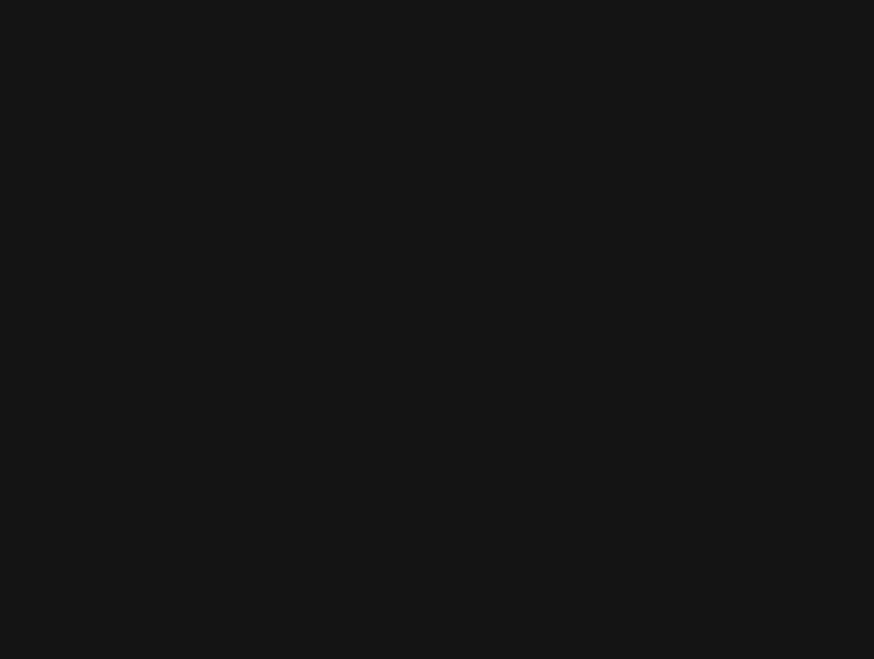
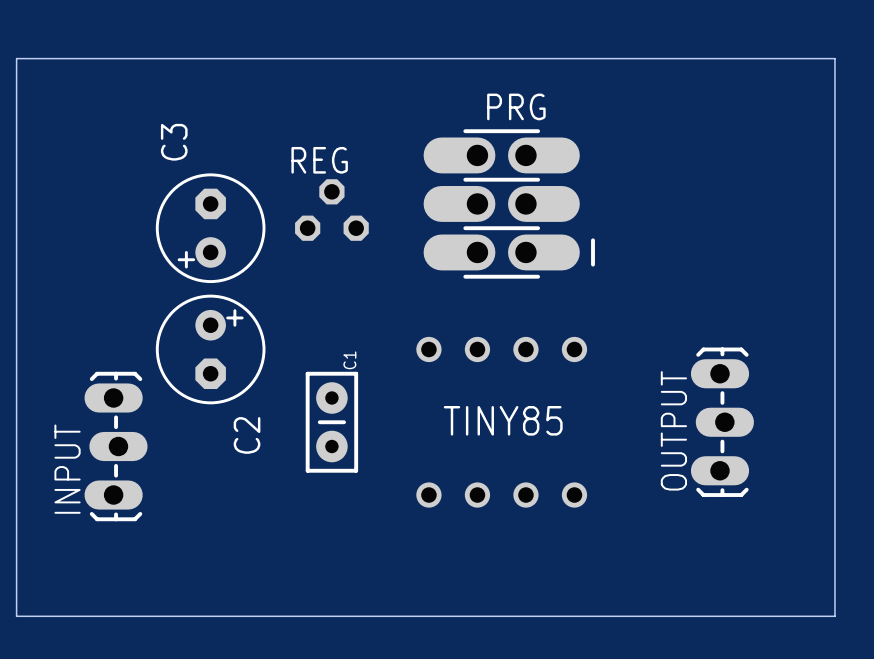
board edge: none -> (16, 58) (834, 58) (834, 616) (16, 616) (16, 58)
PRG: none -> (509, 203)
REG: none -> (331, 210)
C3: none -> (210, 228)
C2: none -> (210, 349)
C1: none -> (331, 422)
TINY85: none -> (501, 422)
OUTPUT: none -> (722, 422)
INPUT: none -> (116, 446)

